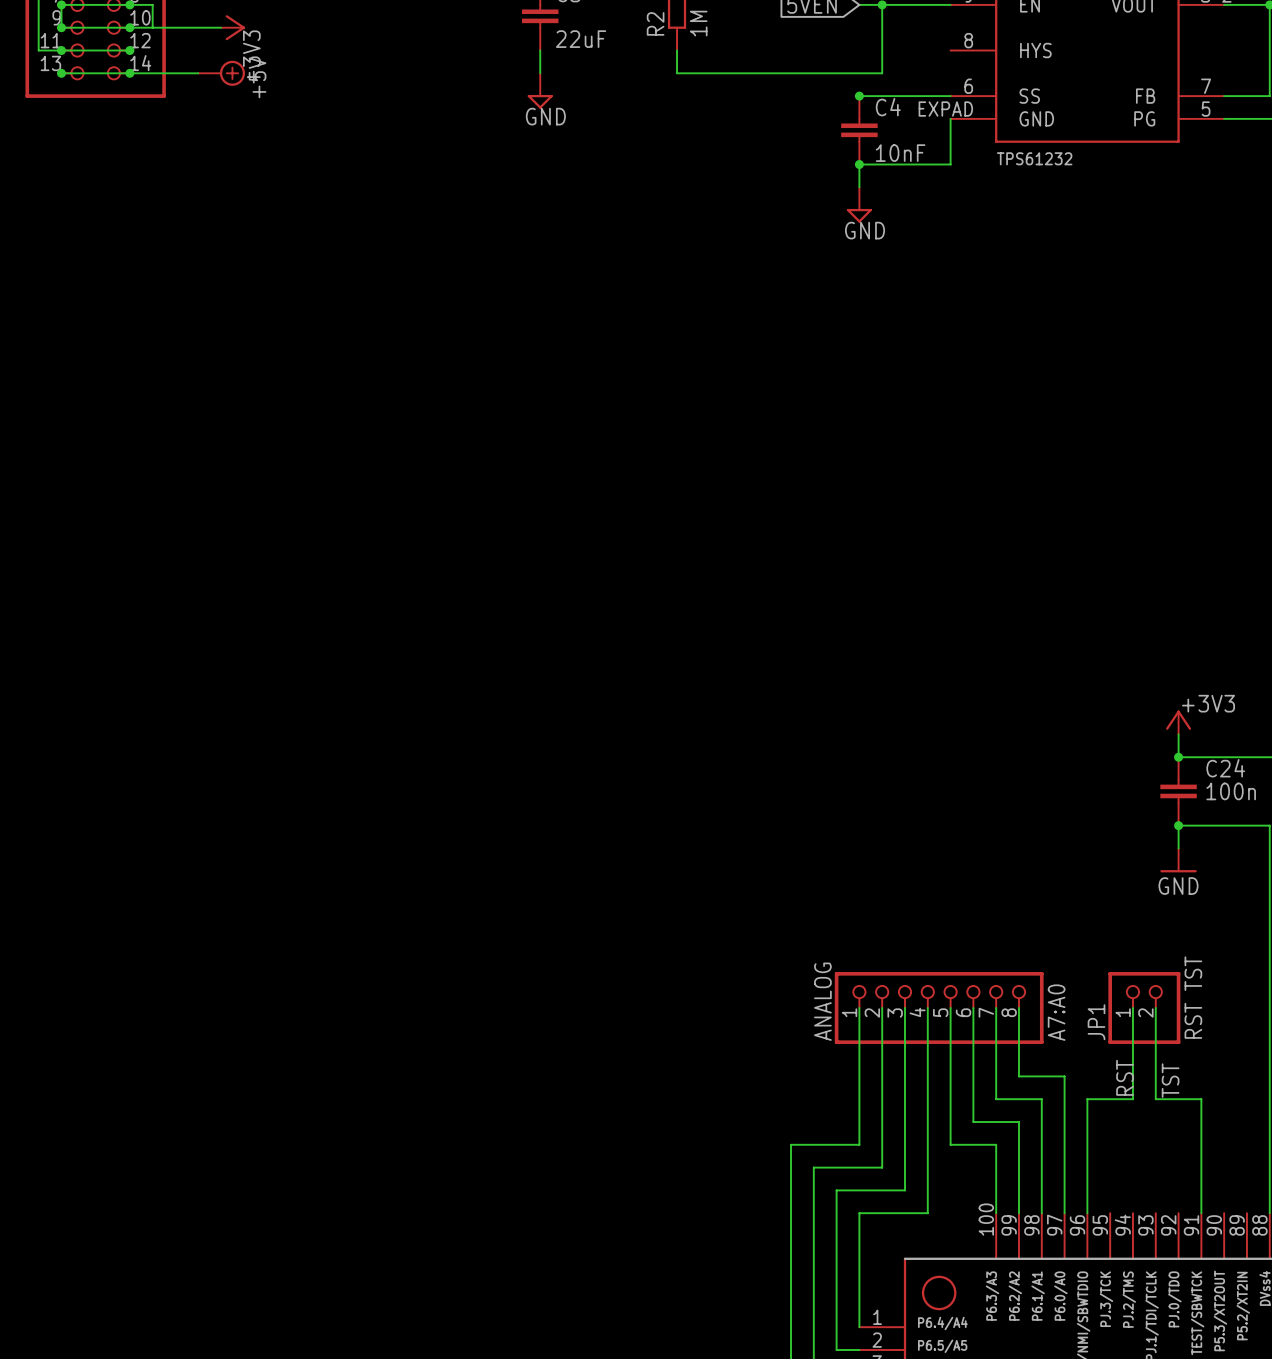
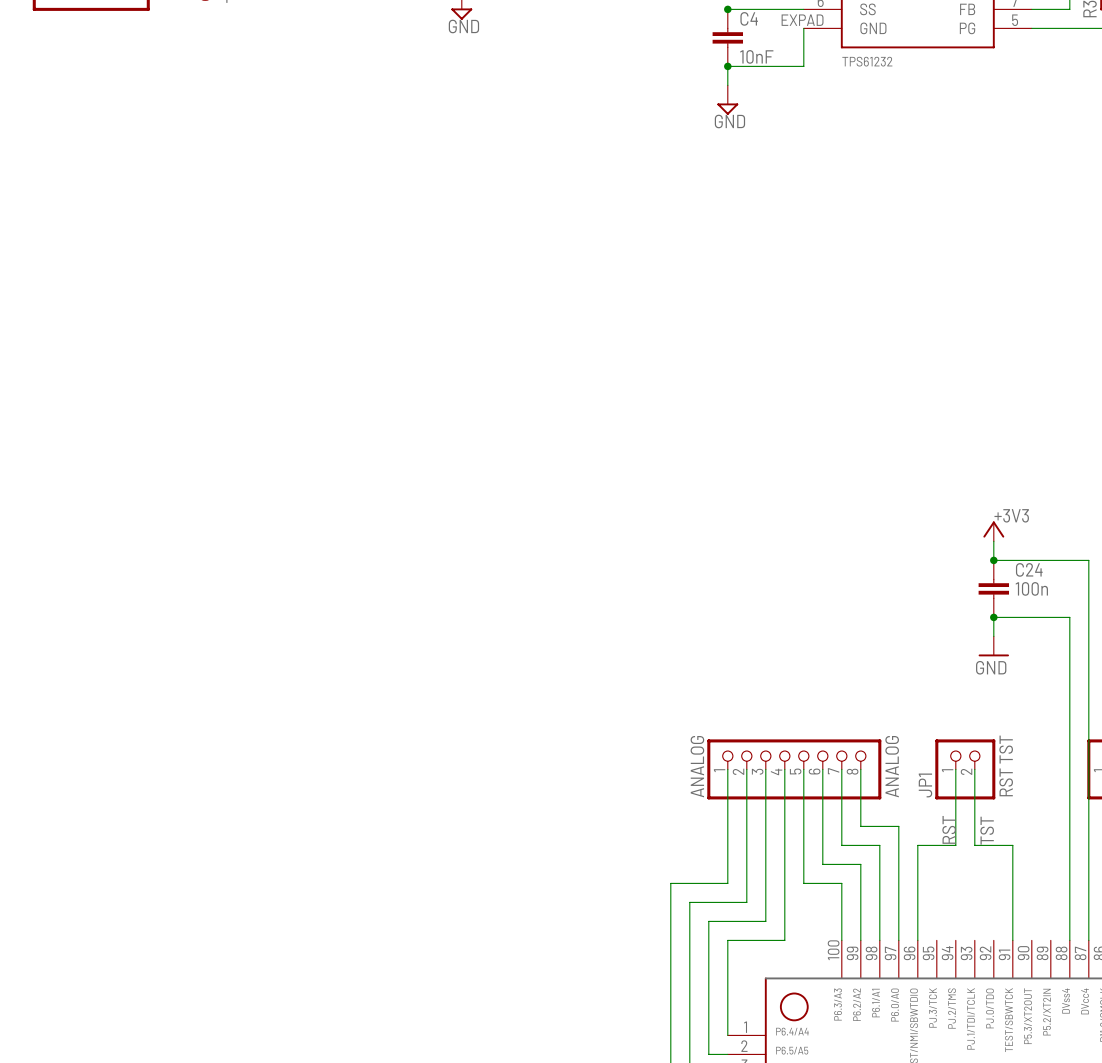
ANALOG value: A7:A0 (1056, 1012) -> ANALOG (892, 766)

